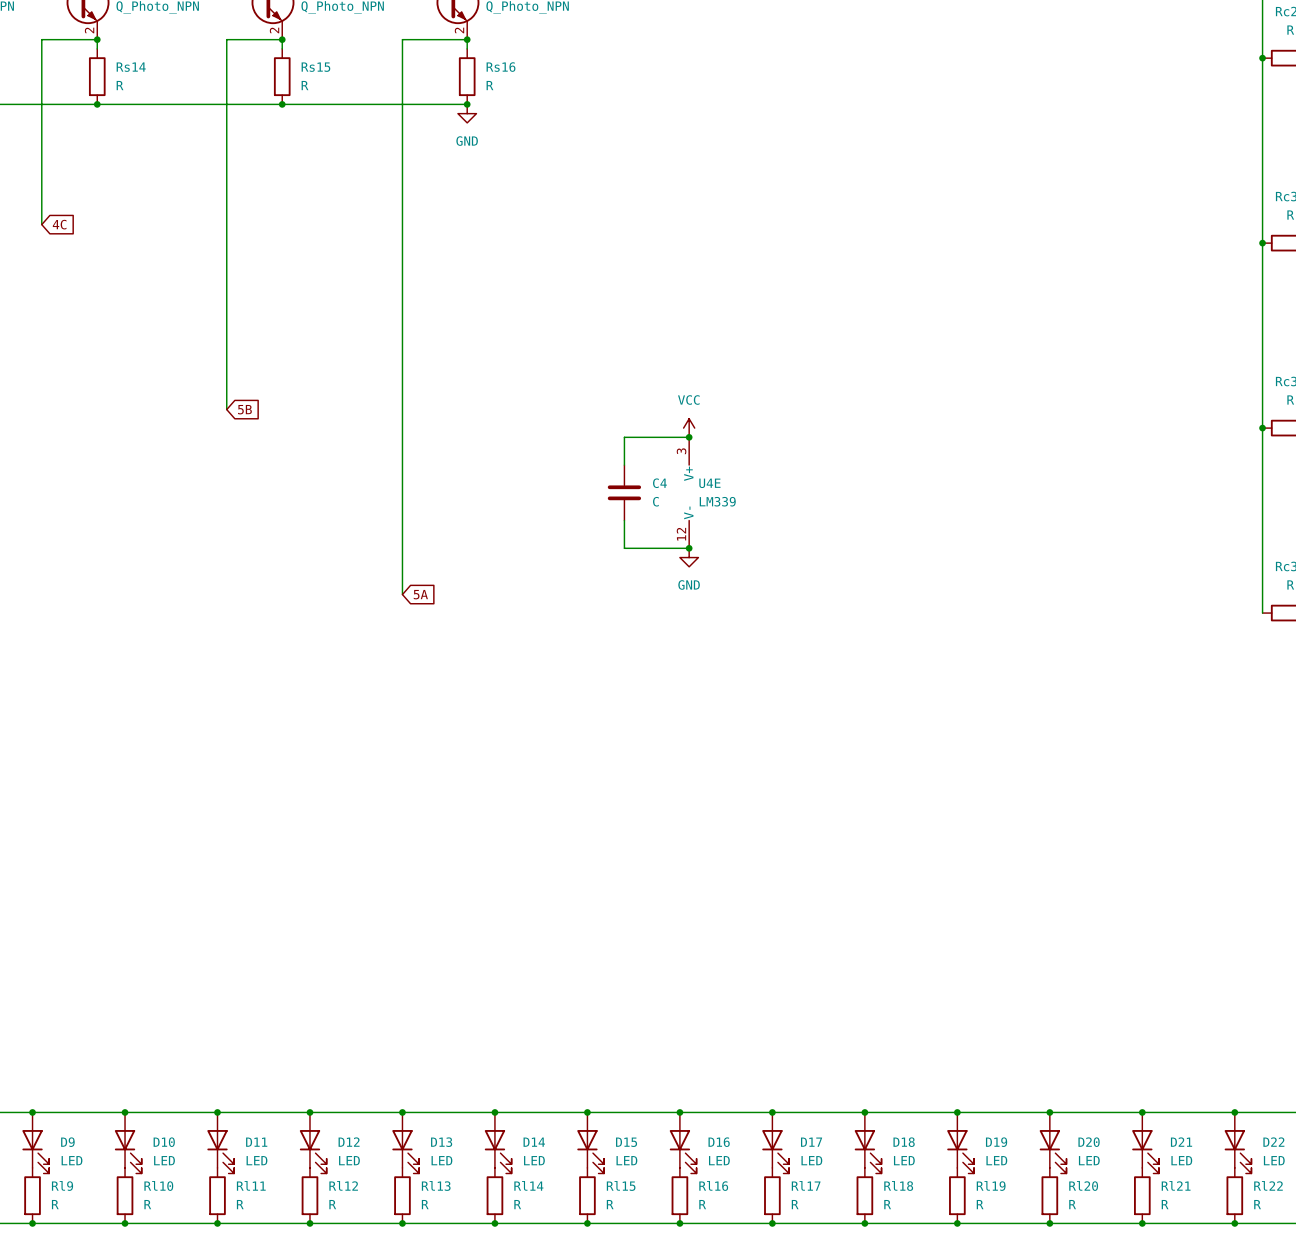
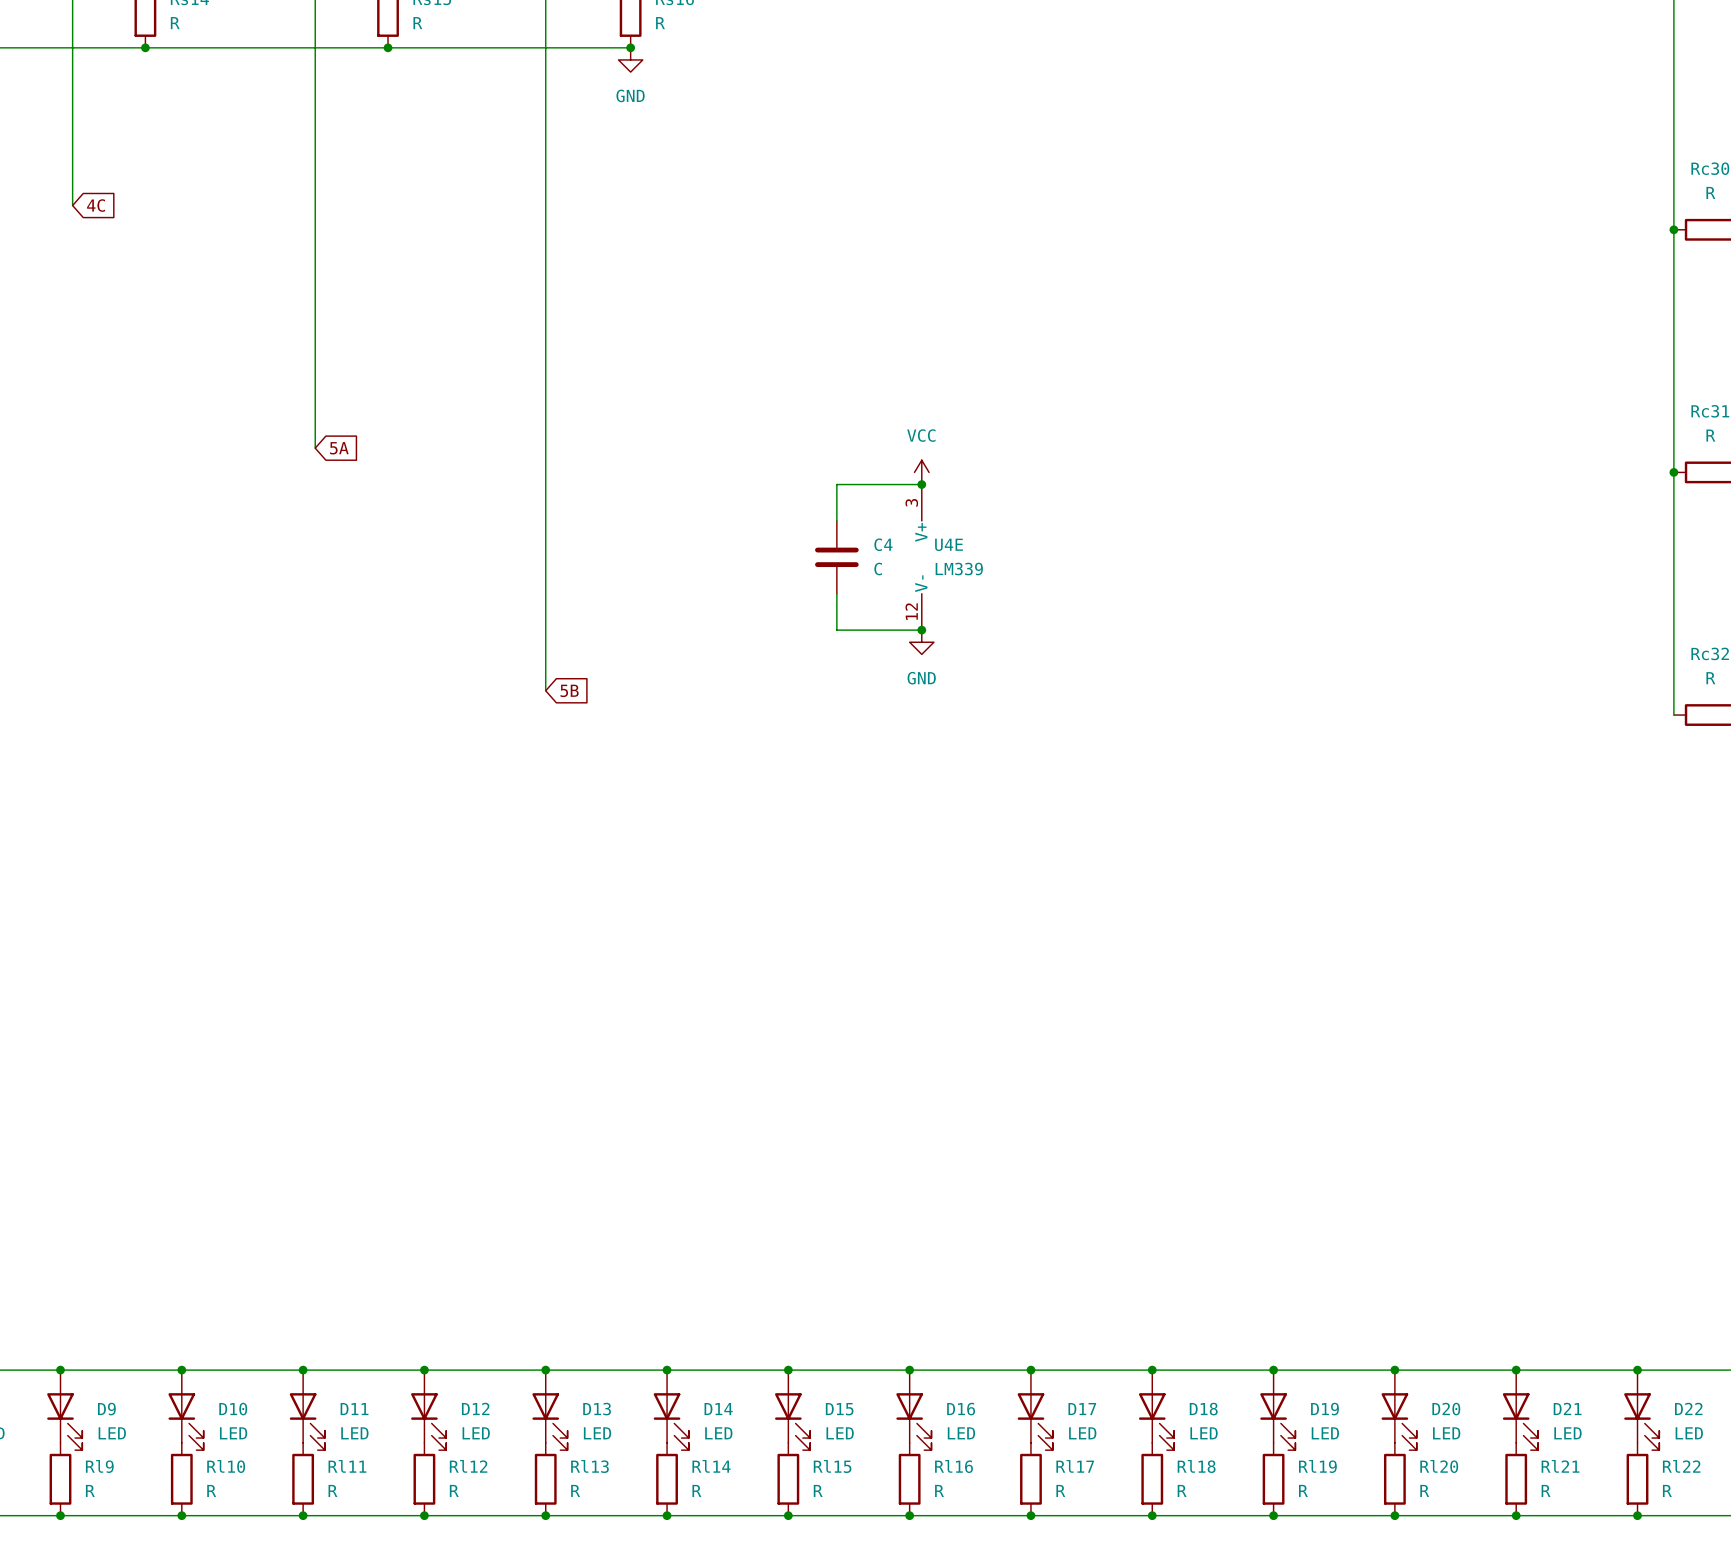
global label: 5B (244, 409) -> 5A (339, 448)
global label: 5A (420, 594) -> 5B (569, 690)

